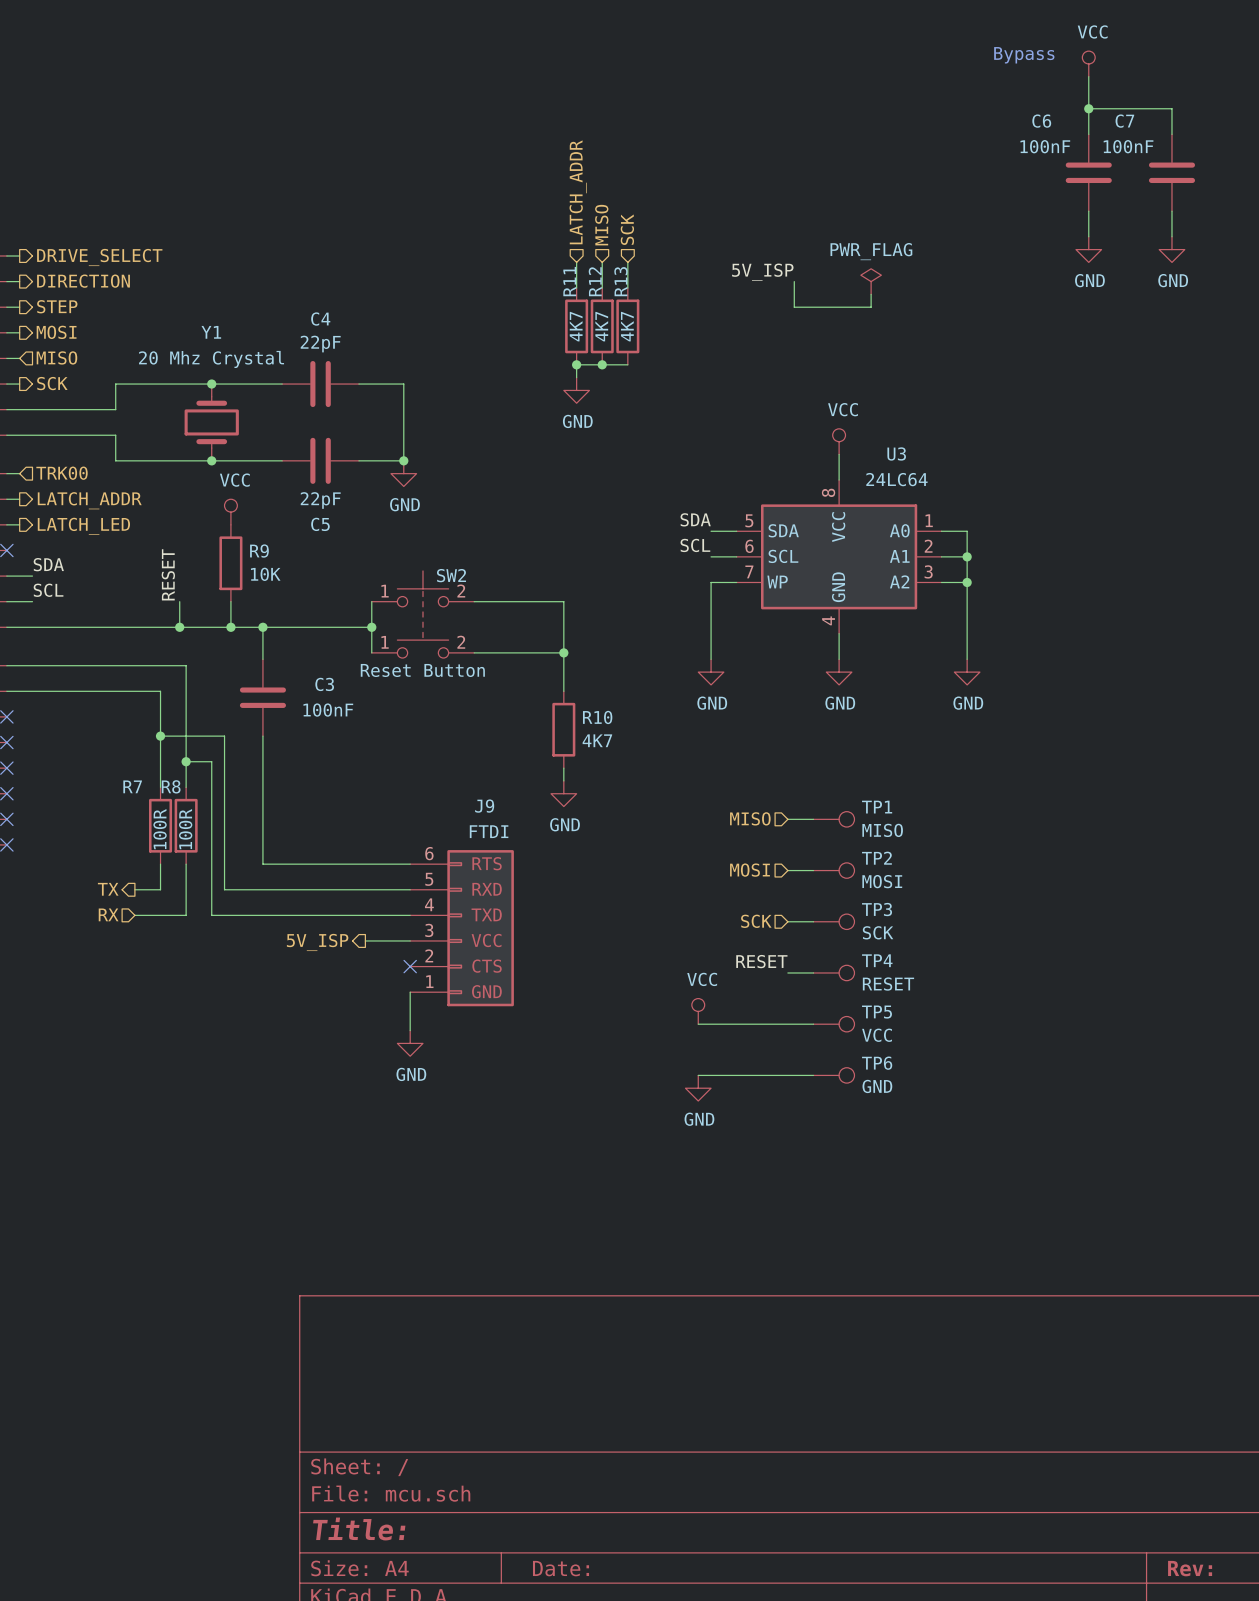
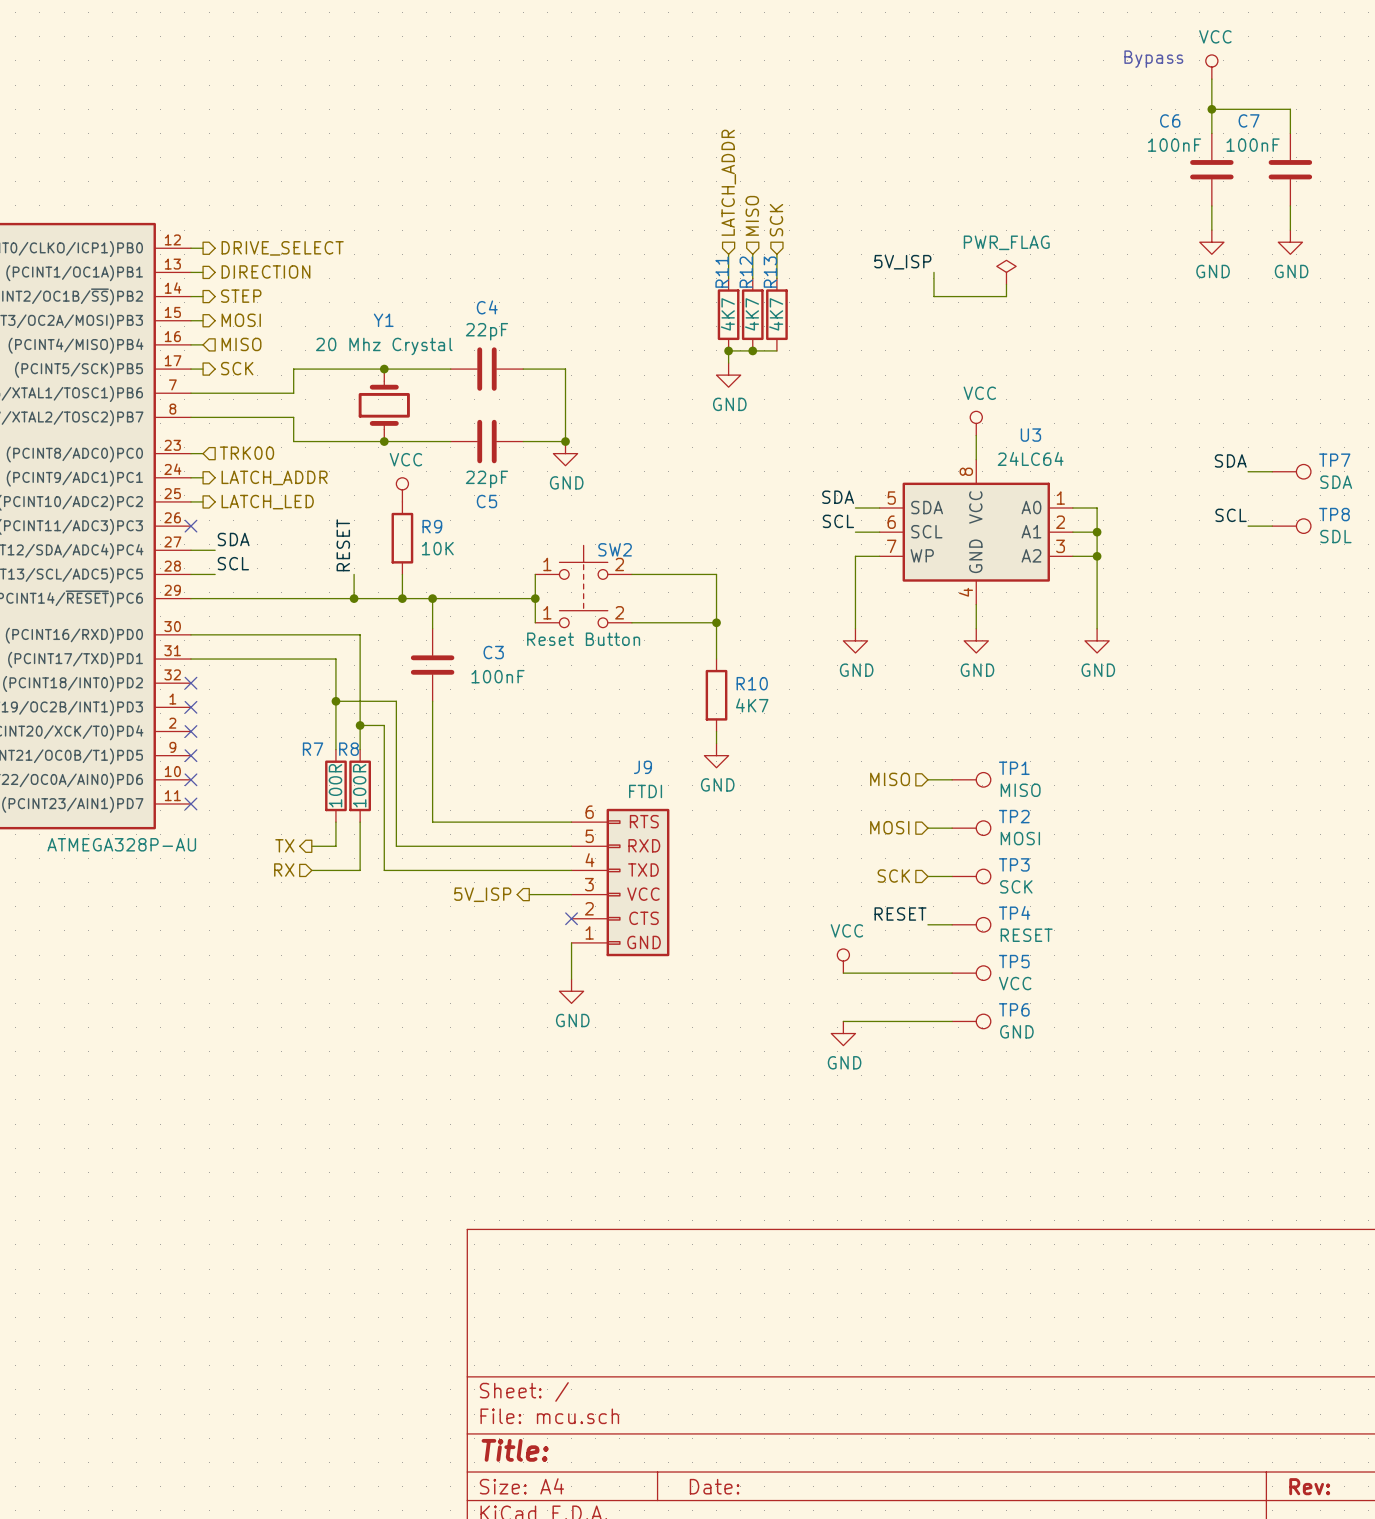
label: none -> SDA (1230, 460)
wire: none -> (1248, 471) (1272, 471)
TP7: none -> SDA (1291, 471)
label: none -> SCL (1231, 515)
wire: none -> (1248, 526) (1272, 526)
TP8: none -> SDL (1291, 526)

